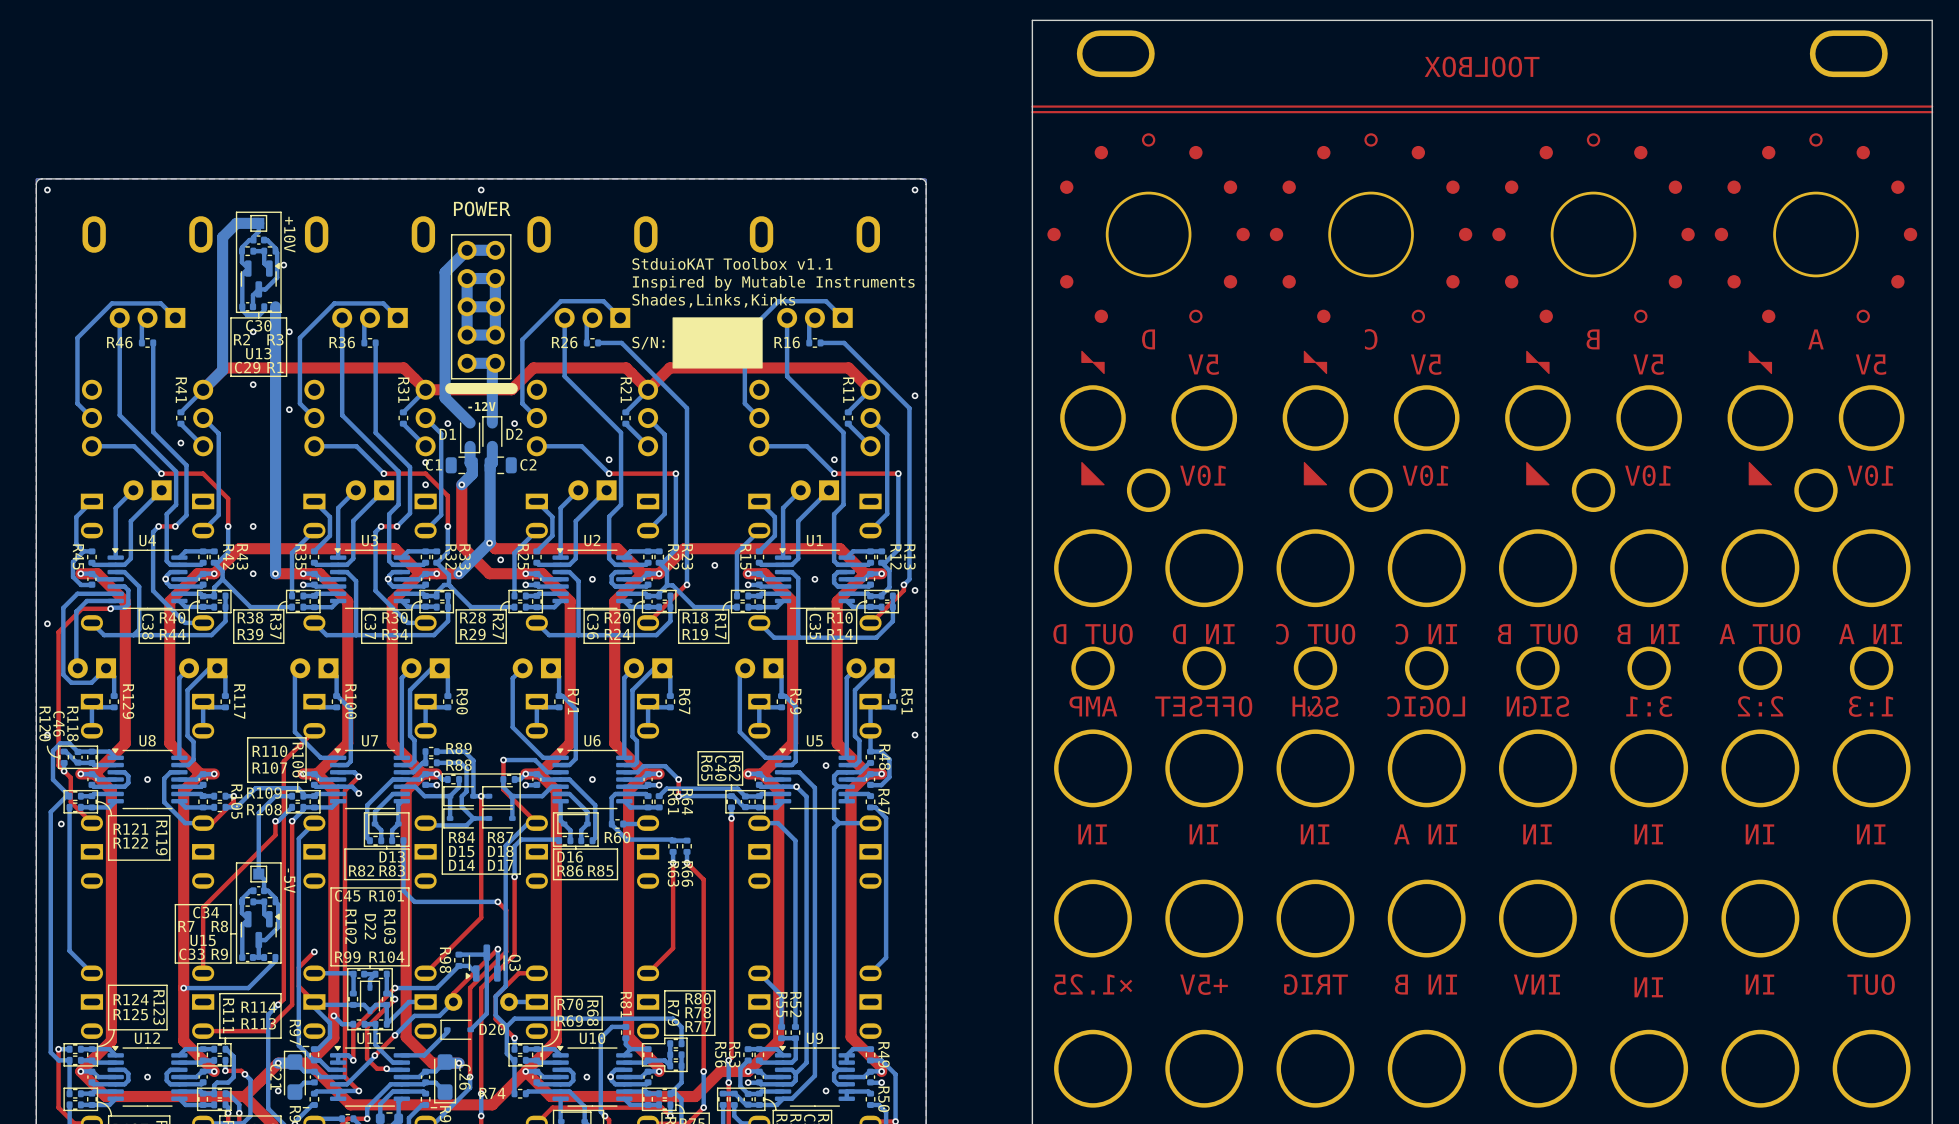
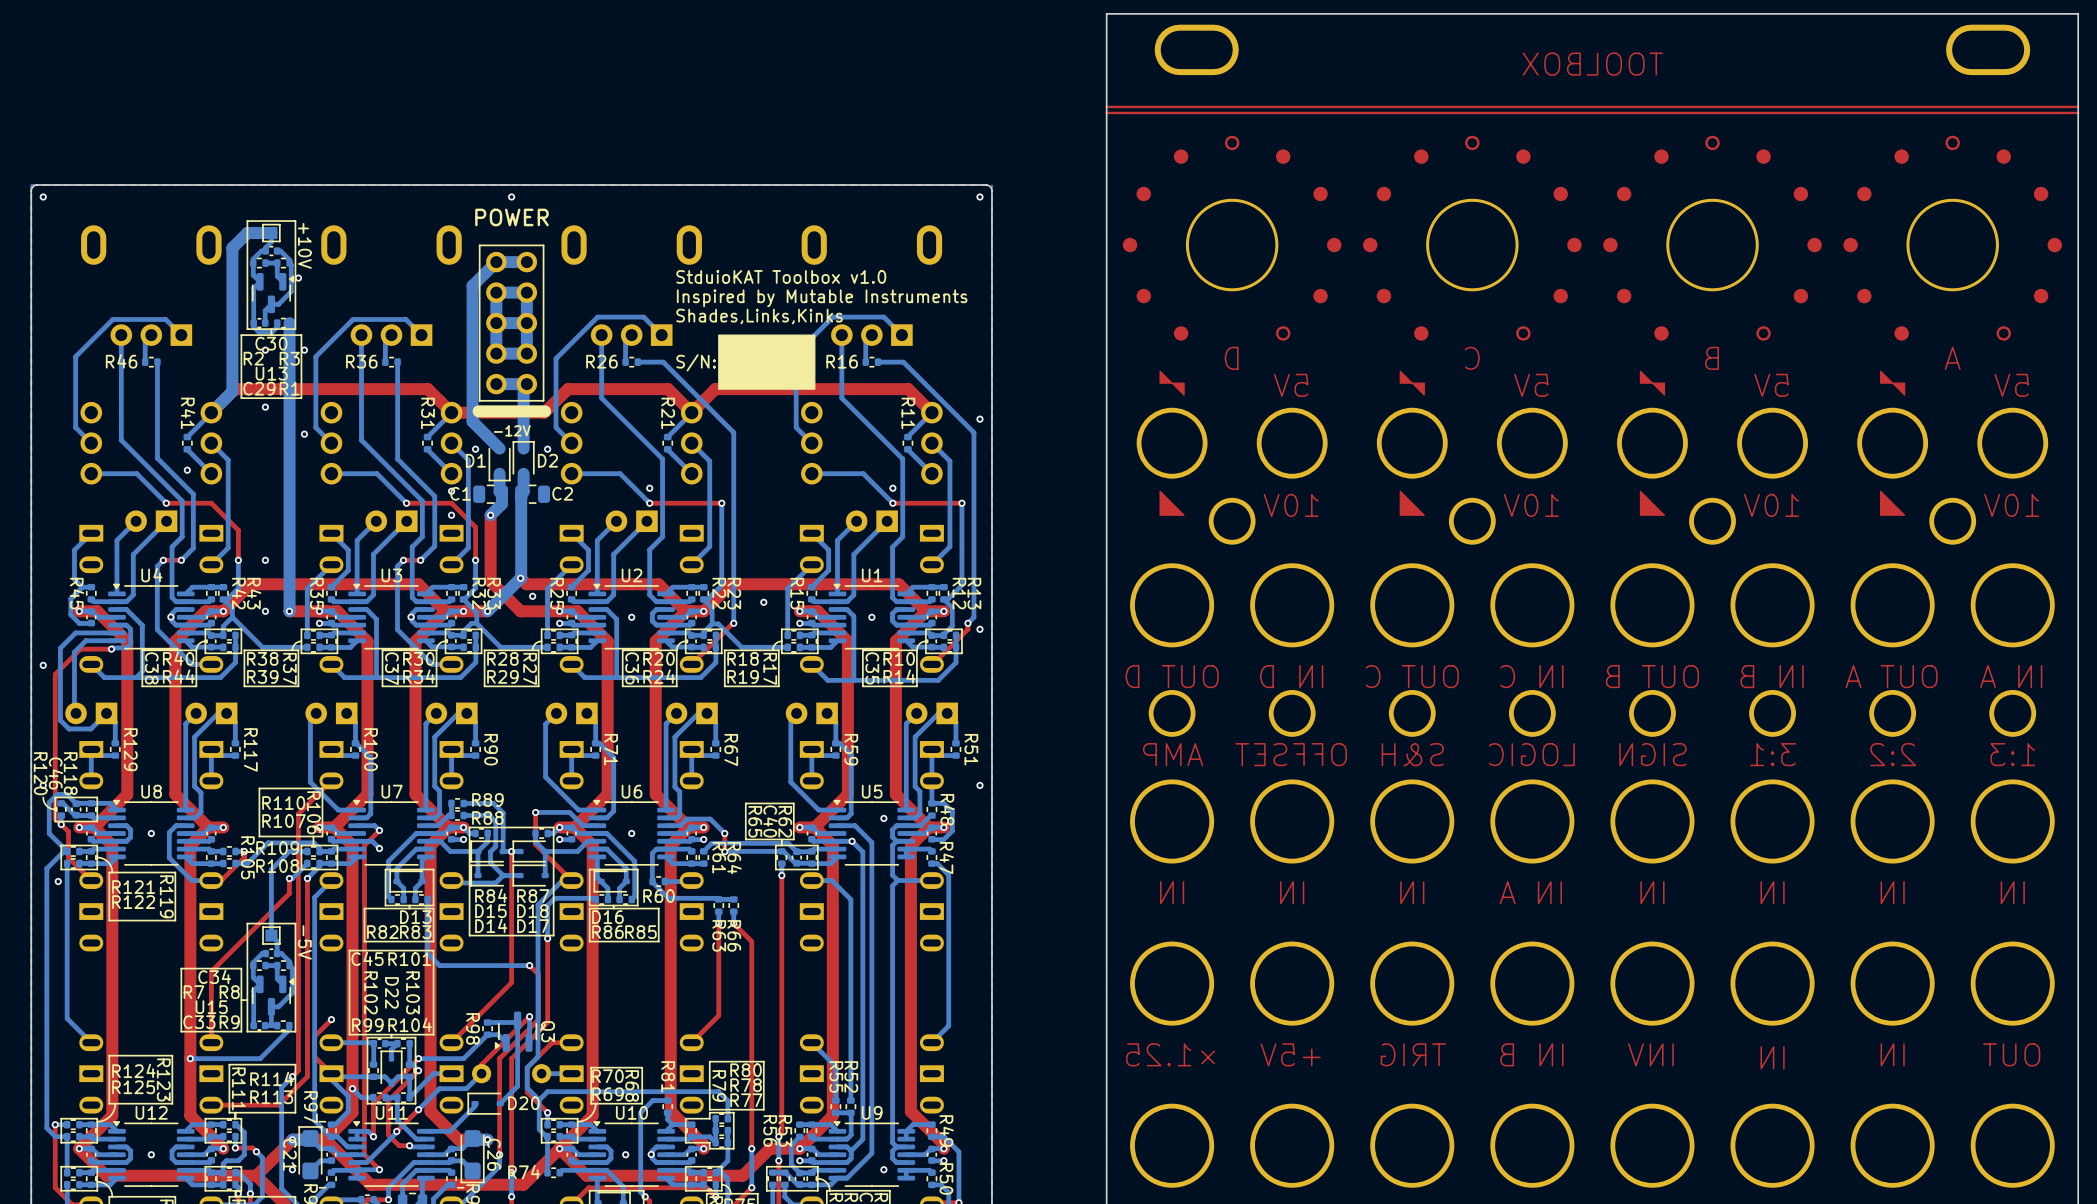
text: StduioKAT Toolbox v1.1 (732, 263) -> StduioKAT Toolbox v1.0 (781, 276)

